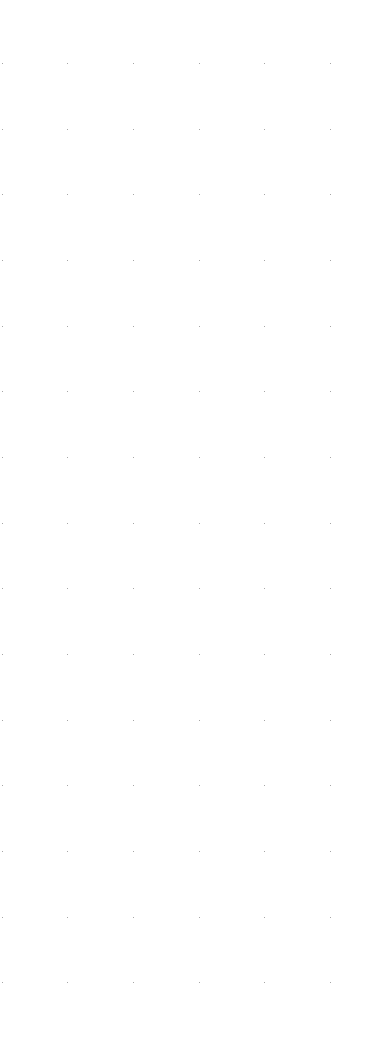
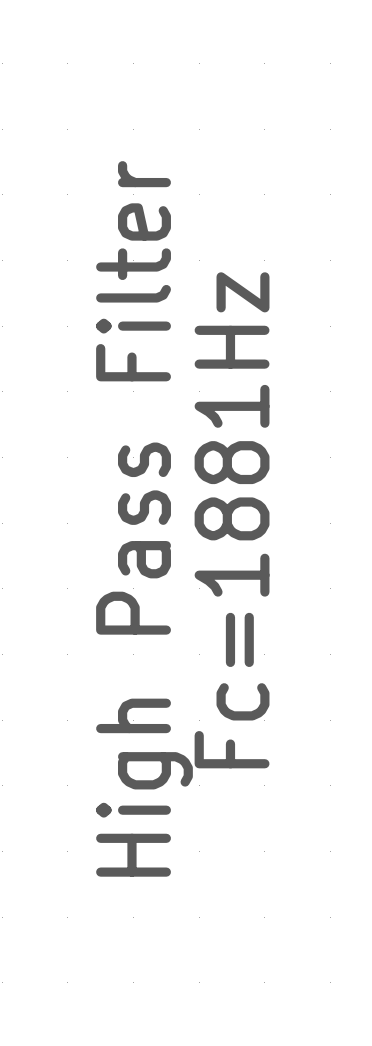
text: none -> High Pass Filter (144, 518)
text: none -> Fc=1881Hz (232, 520)

